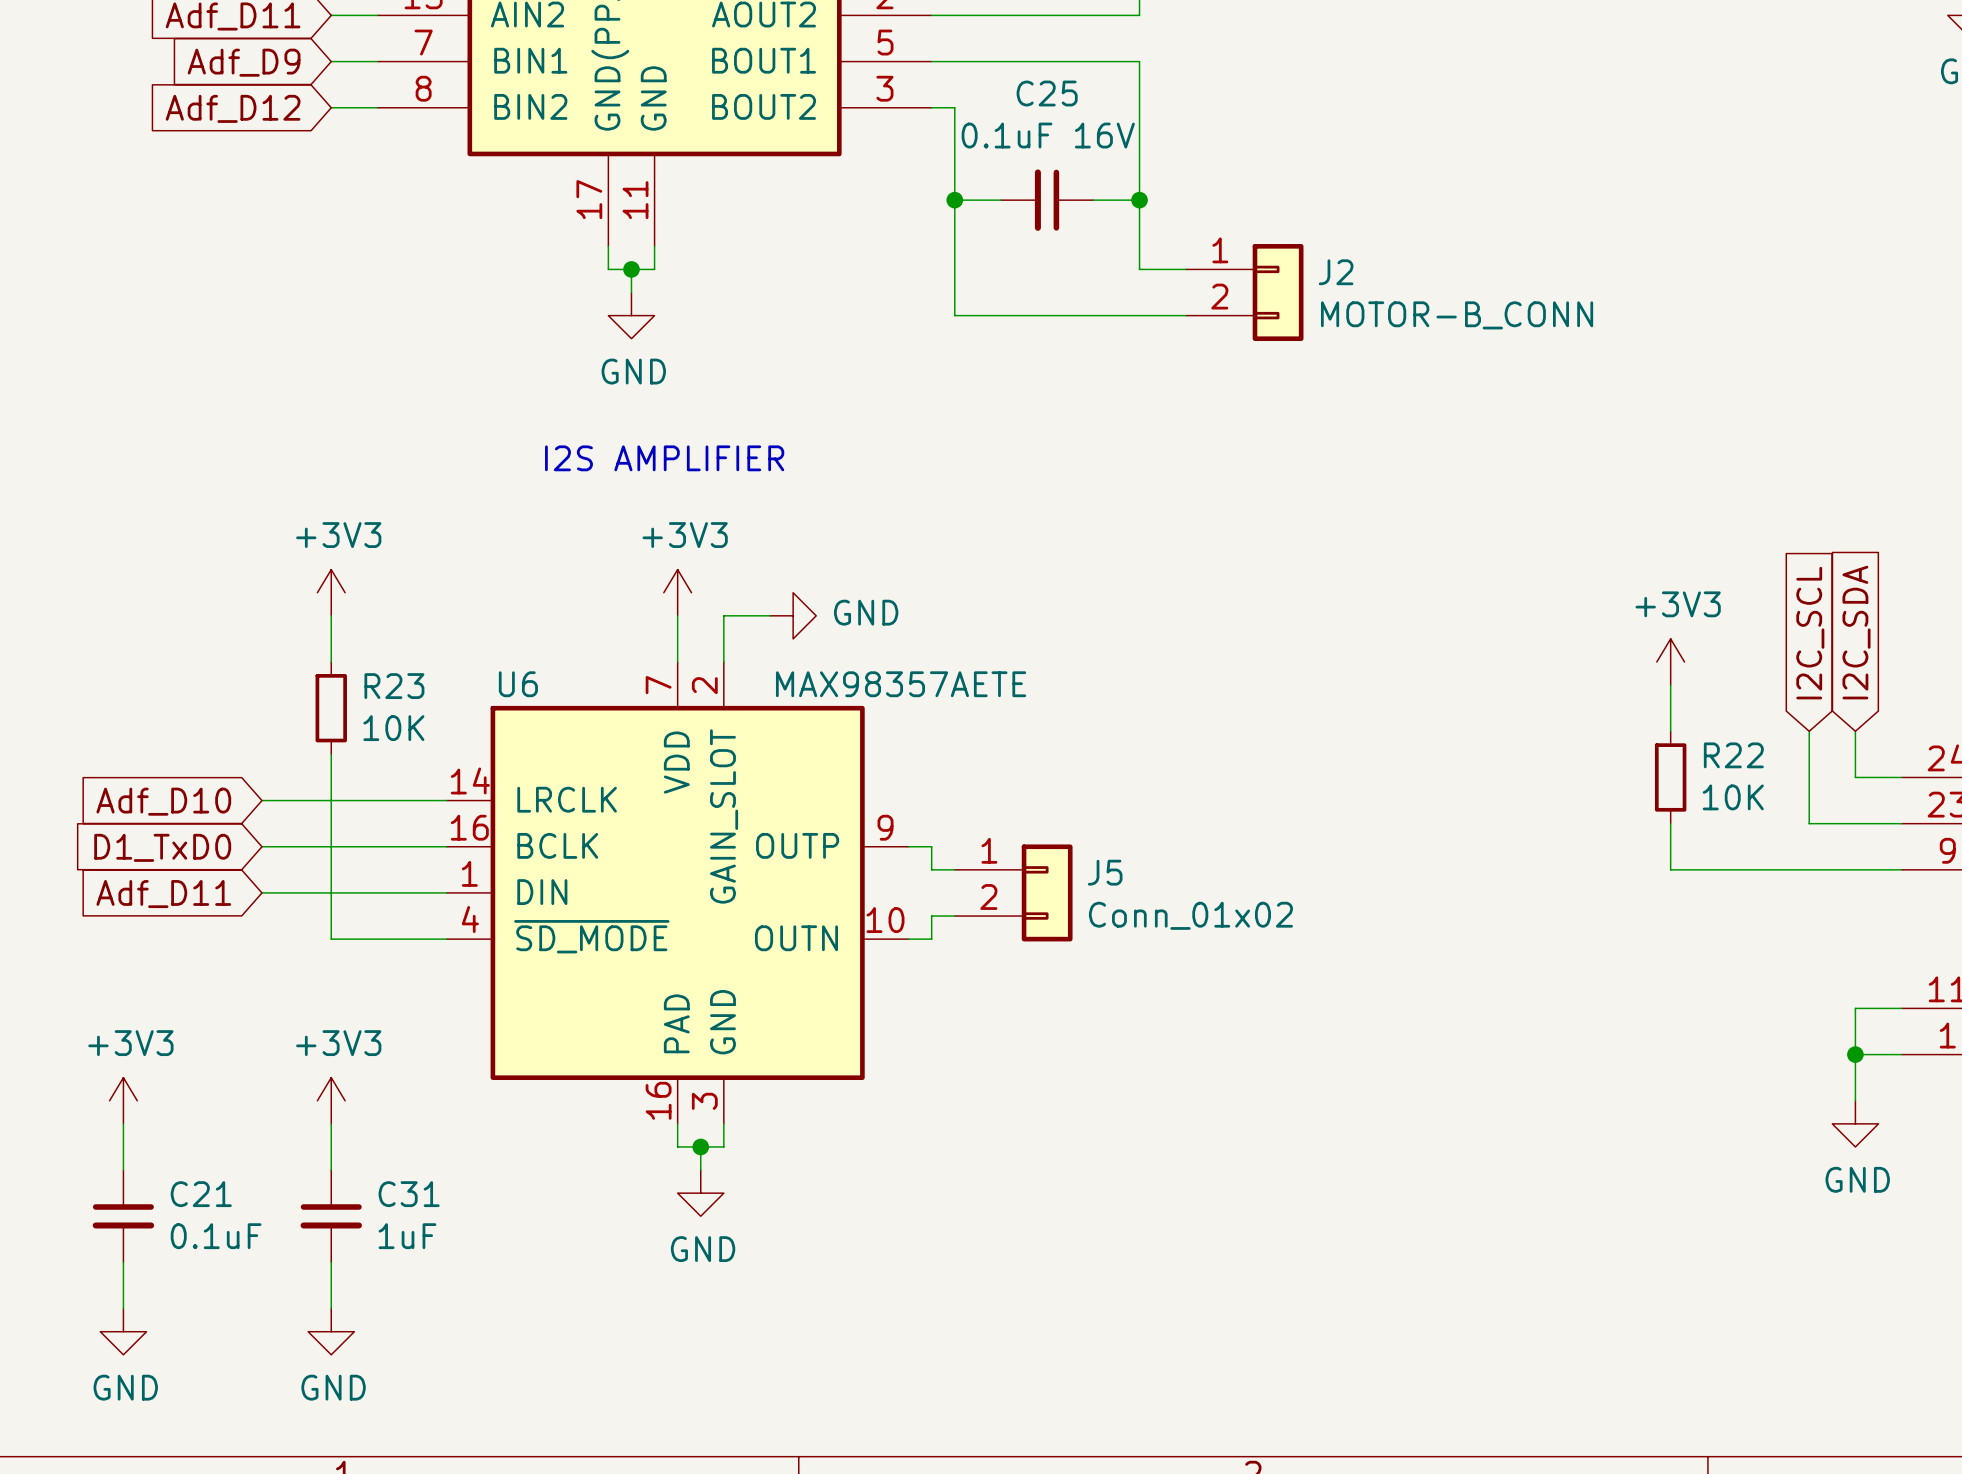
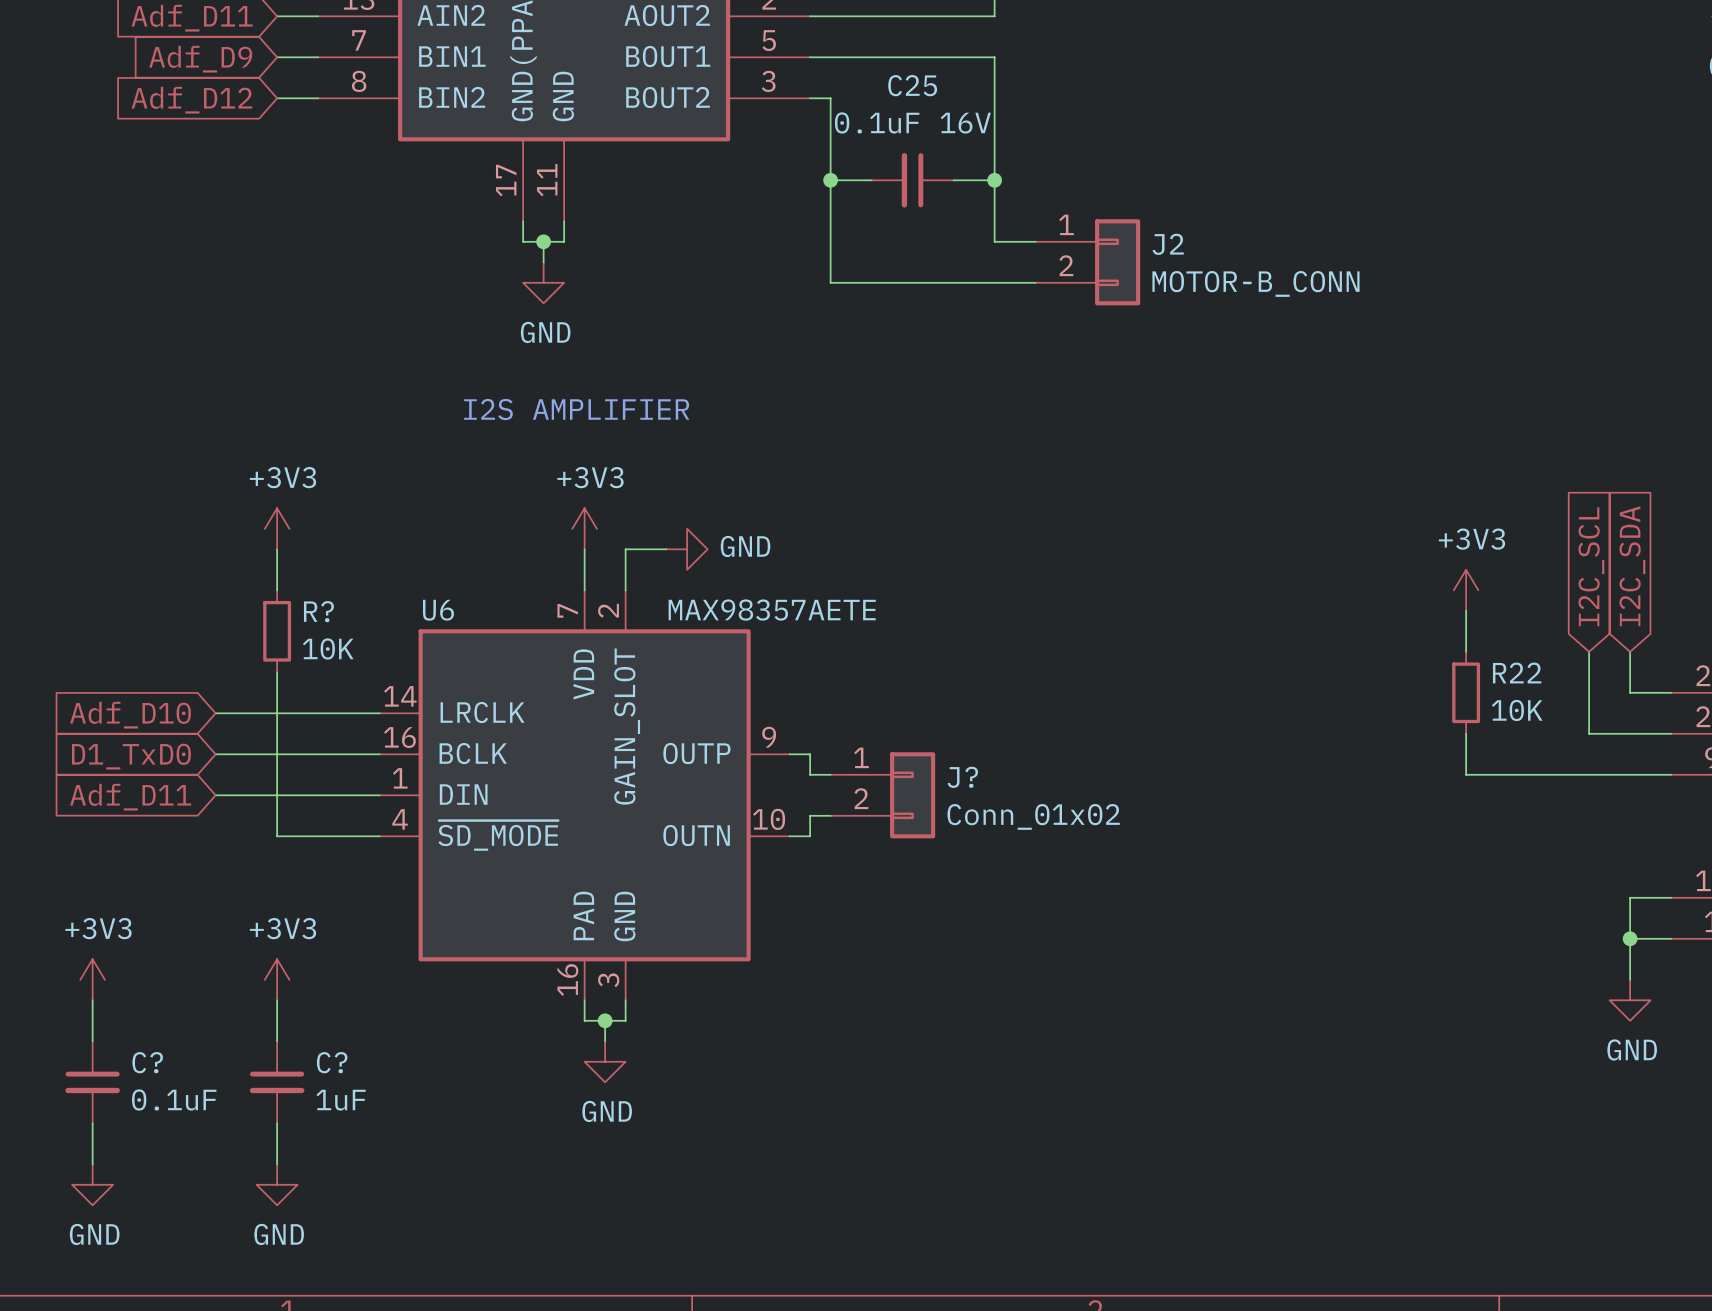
R23 name: R23 (394, 686) -> R? (318, 611)
J5 name: J5 (1105, 872) -> J? (962, 777)
C21 name: C21 (201, 1194) -> C? (147, 1062)
C31 name: C31 (409, 1194) -> C? (332, 1062)

